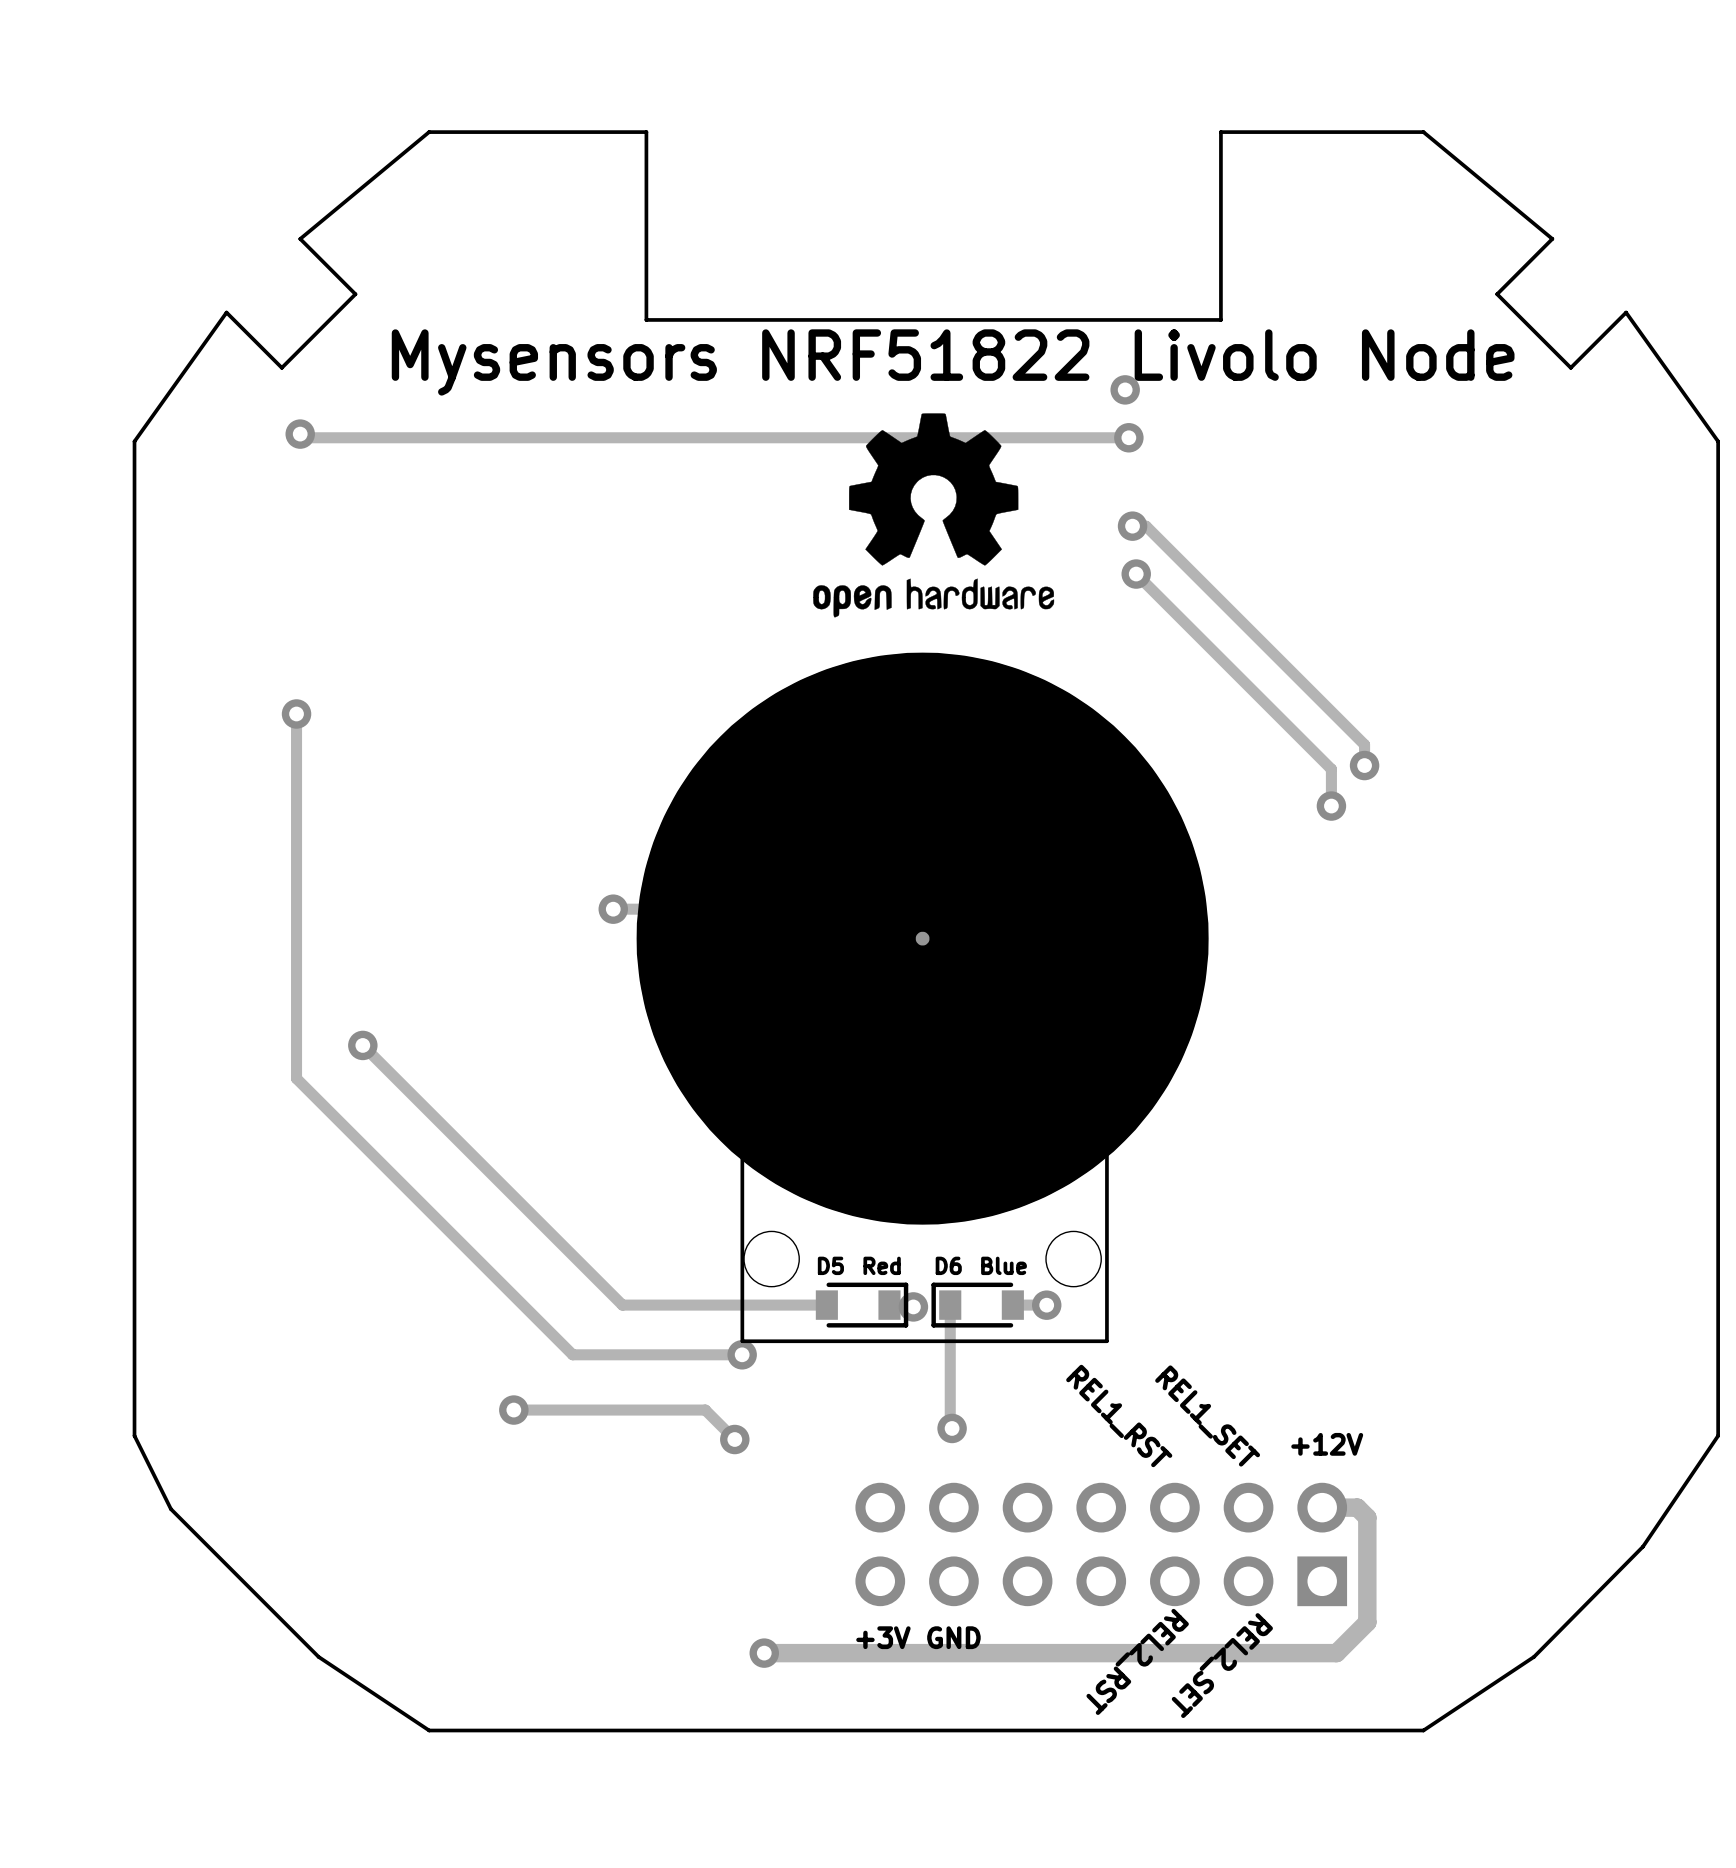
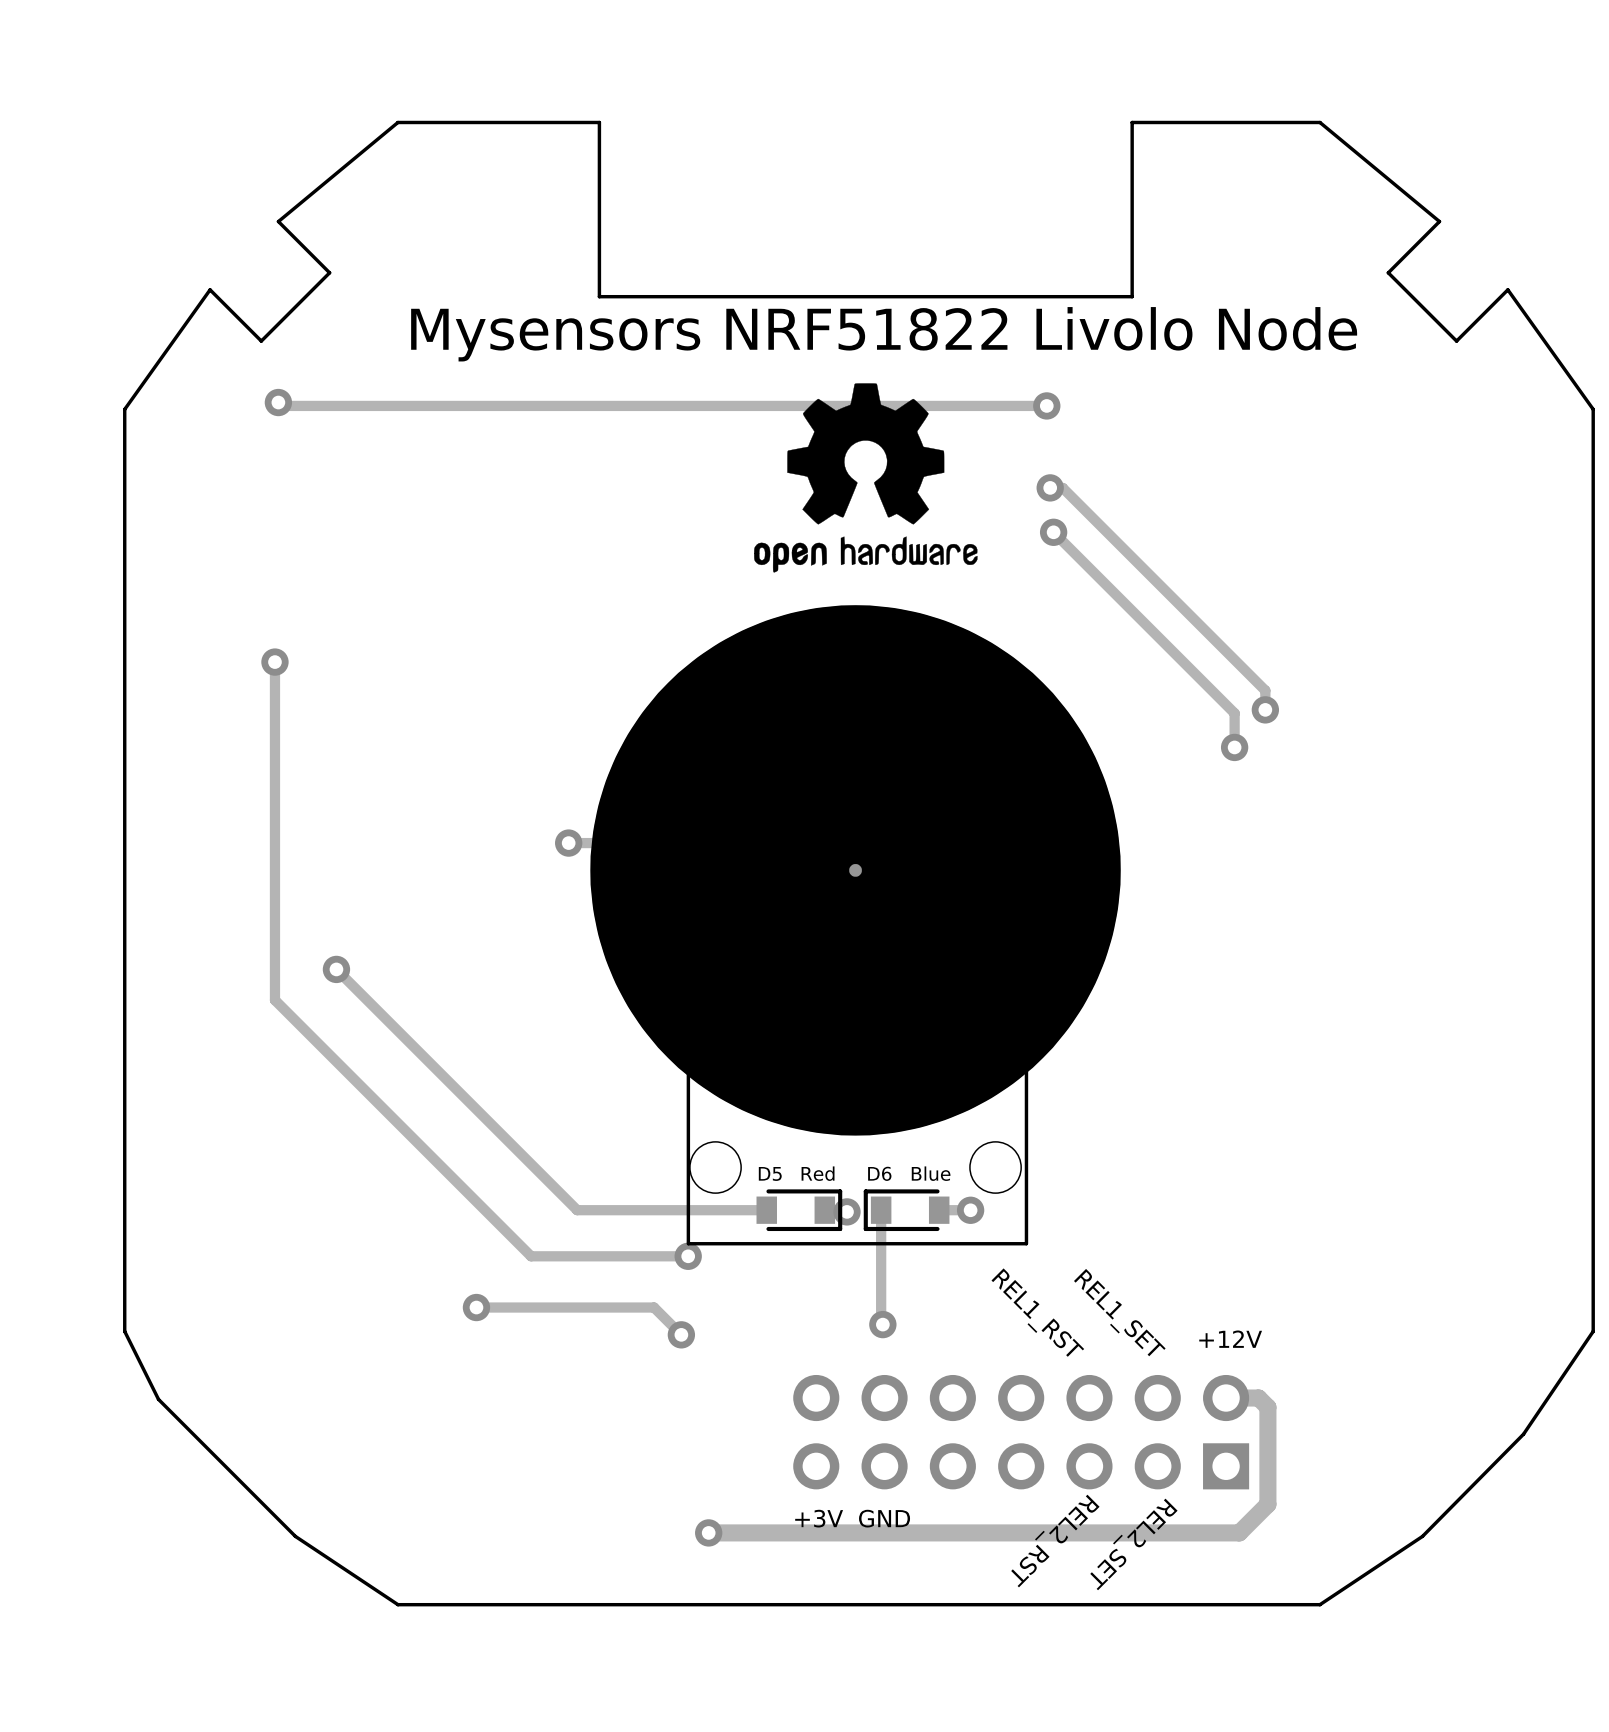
via: (1125, 389) -> none

